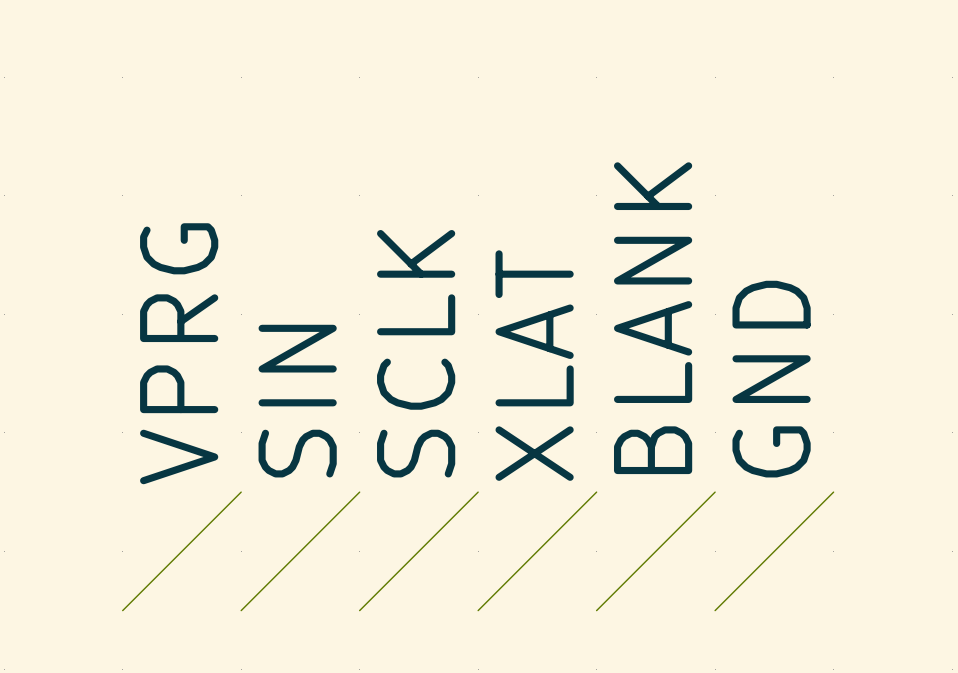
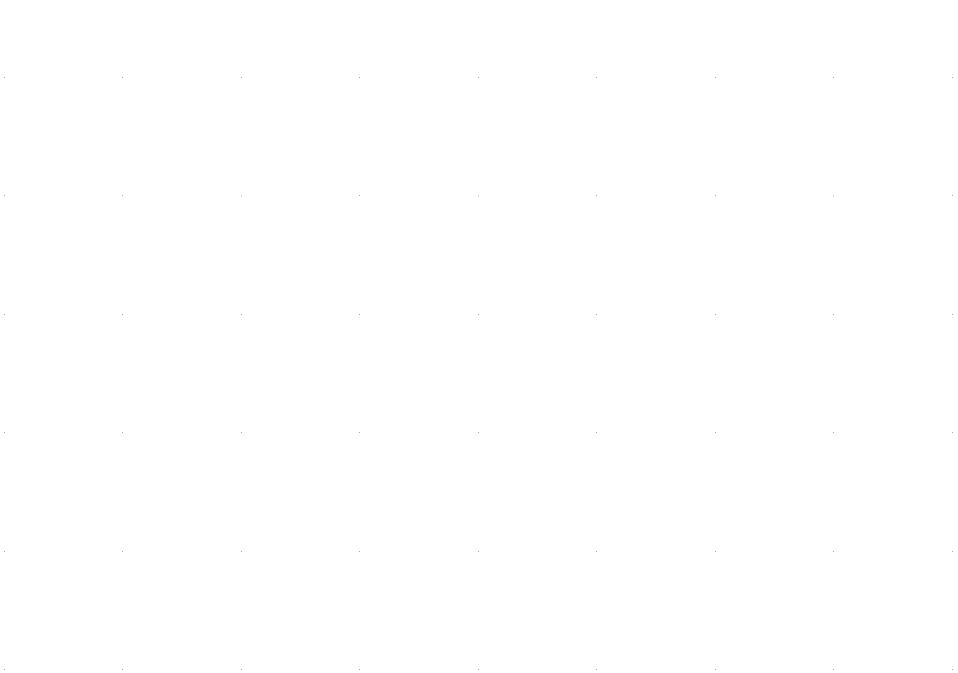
label: BLANK (653, 318) -> none
label: VPRG (179, 353) -> none
label: SCLK (416, 353) -> none
label: XLAT (534, 365) -> none
label: GND (771, 379) -> none
label: SIN (297, 401) -> none
wire: (241, 492) (122, 610) -> none
wire: (359, 492) (241, 610) -> none
wire: (478, 492) (359, 610) -> none
wire: (596, 492) (478, 610) -> none
wire: (715, 492) (596, 610) -> none
wire: (833, 492) (715, 610) -> none

